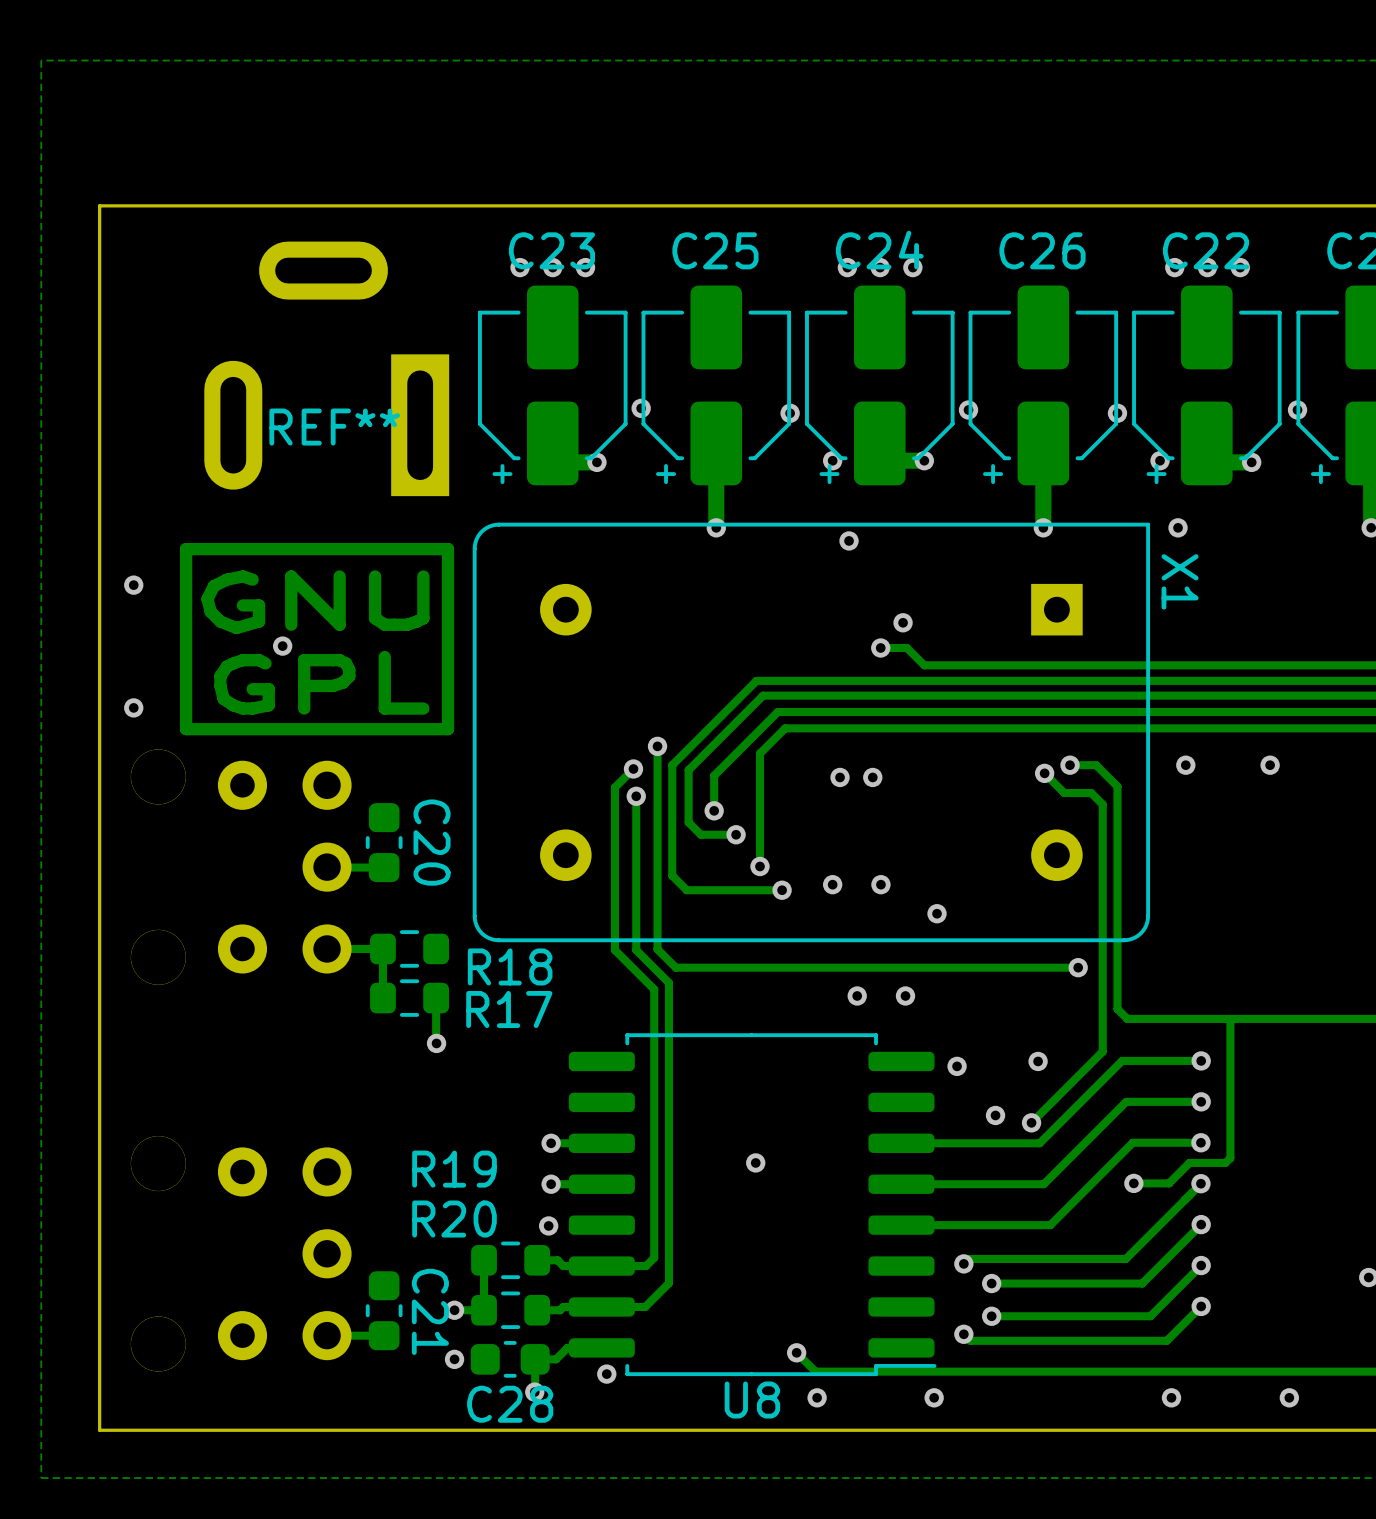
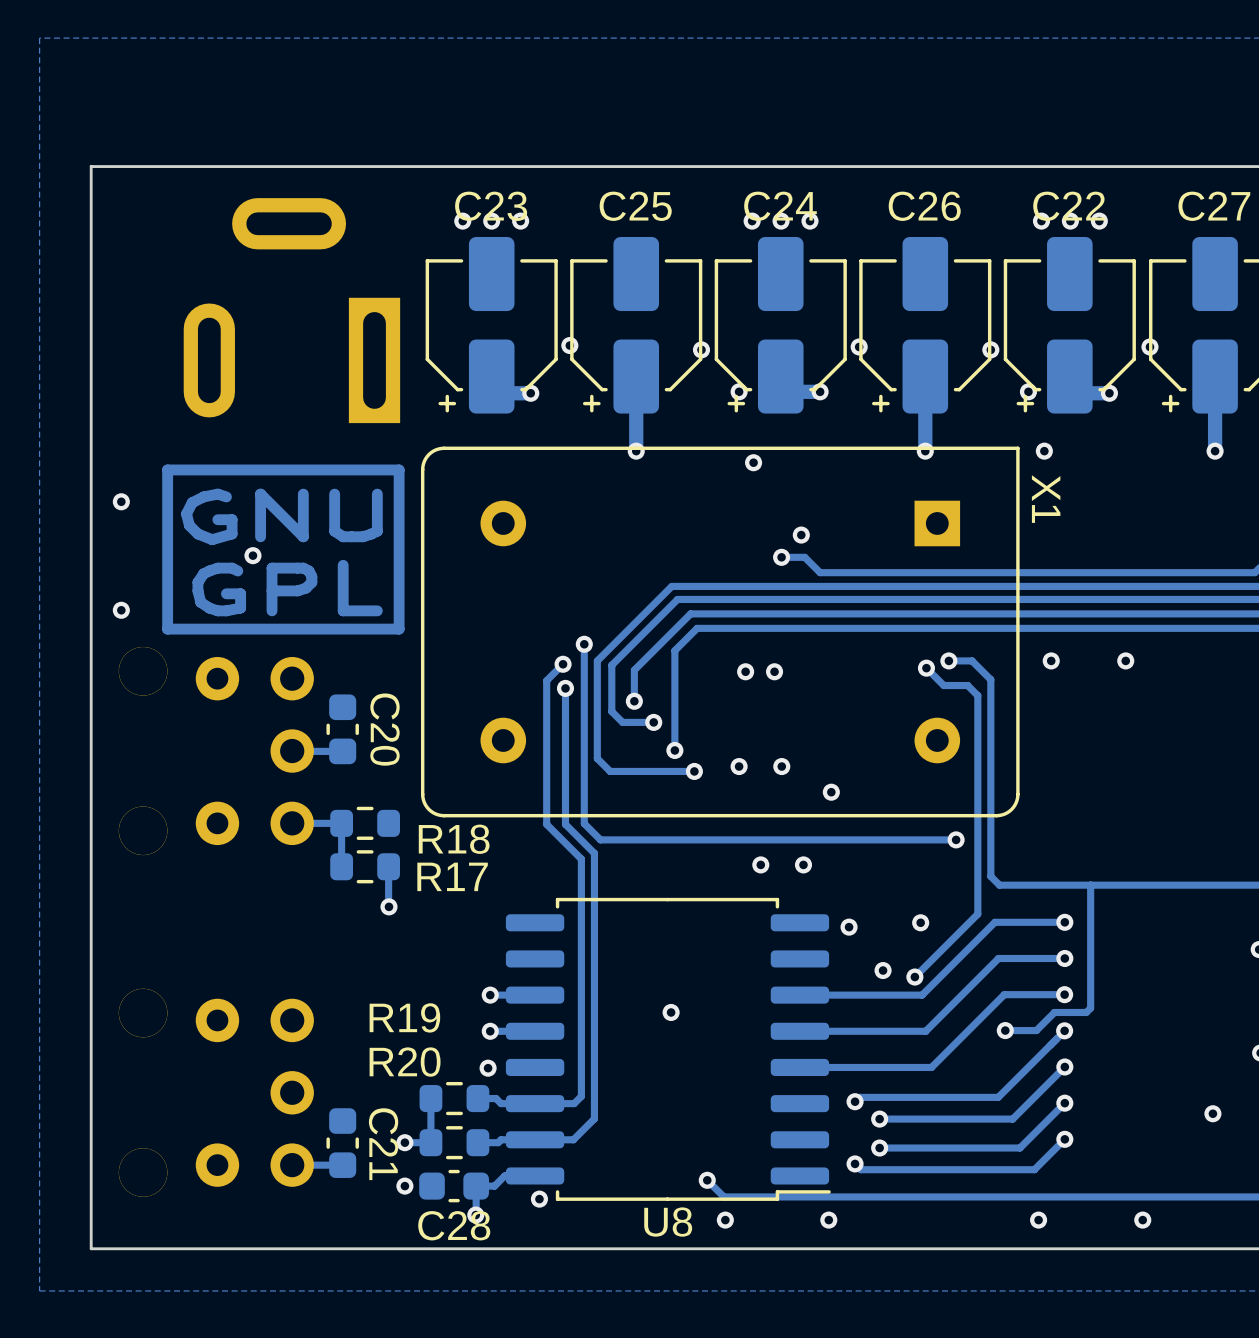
REF**: (317, 639) -> none

